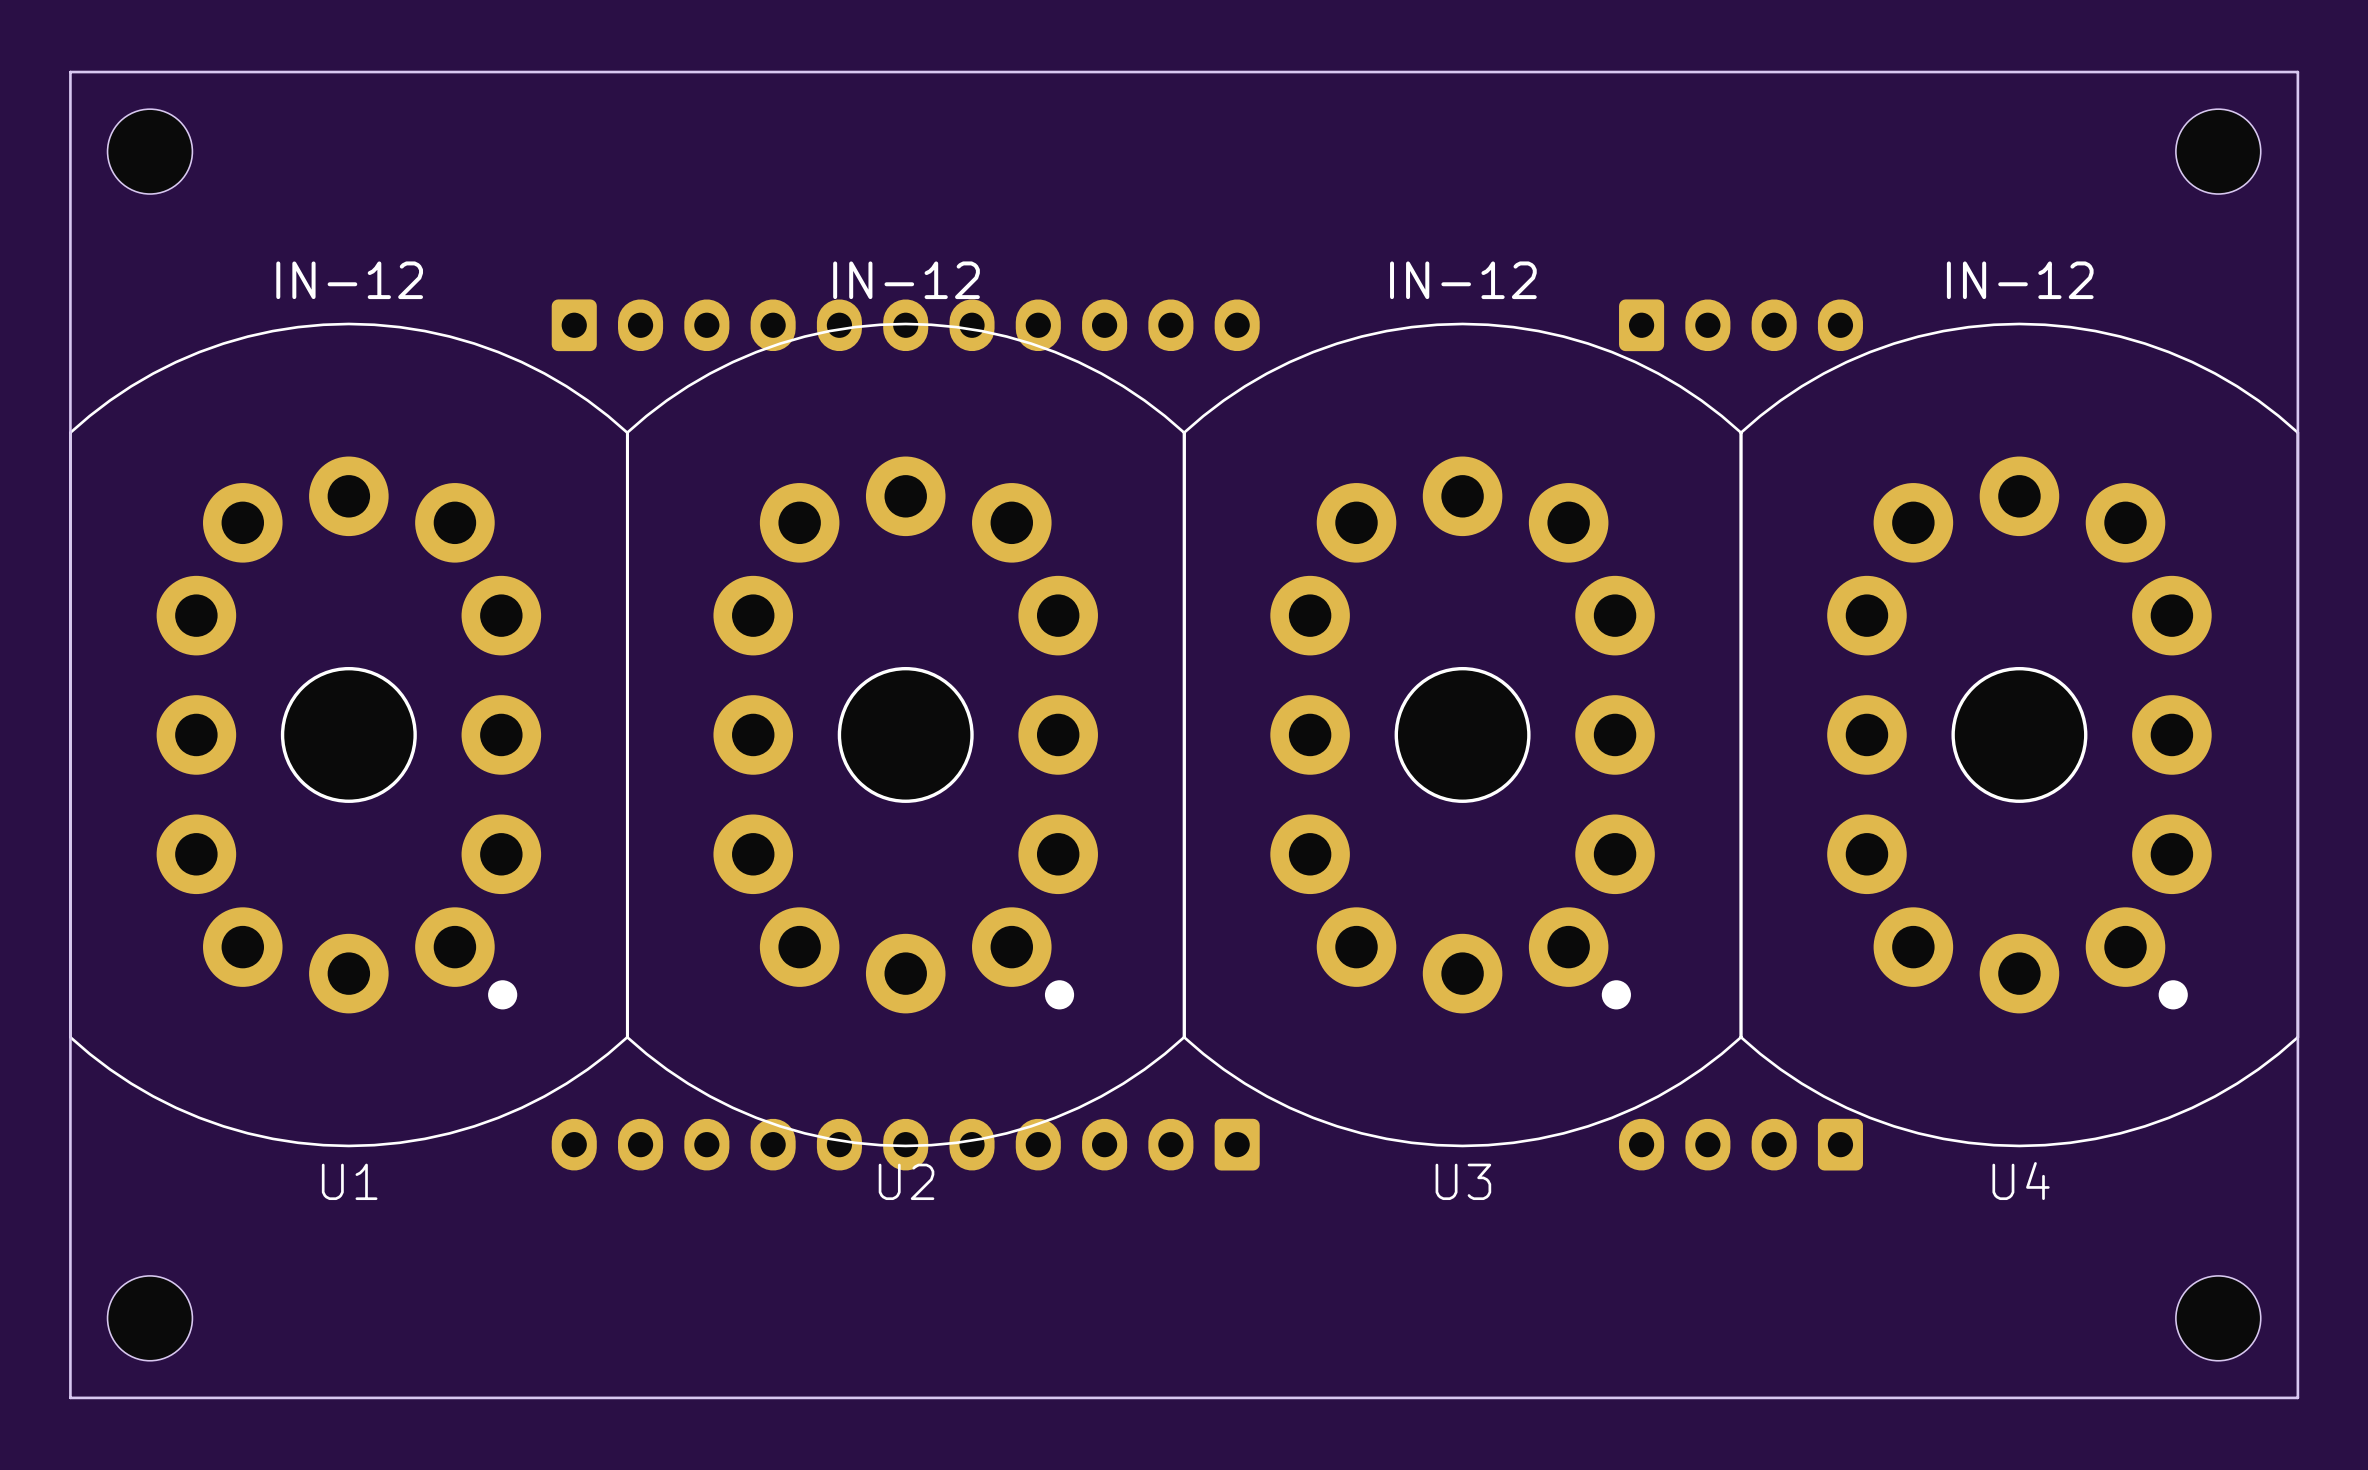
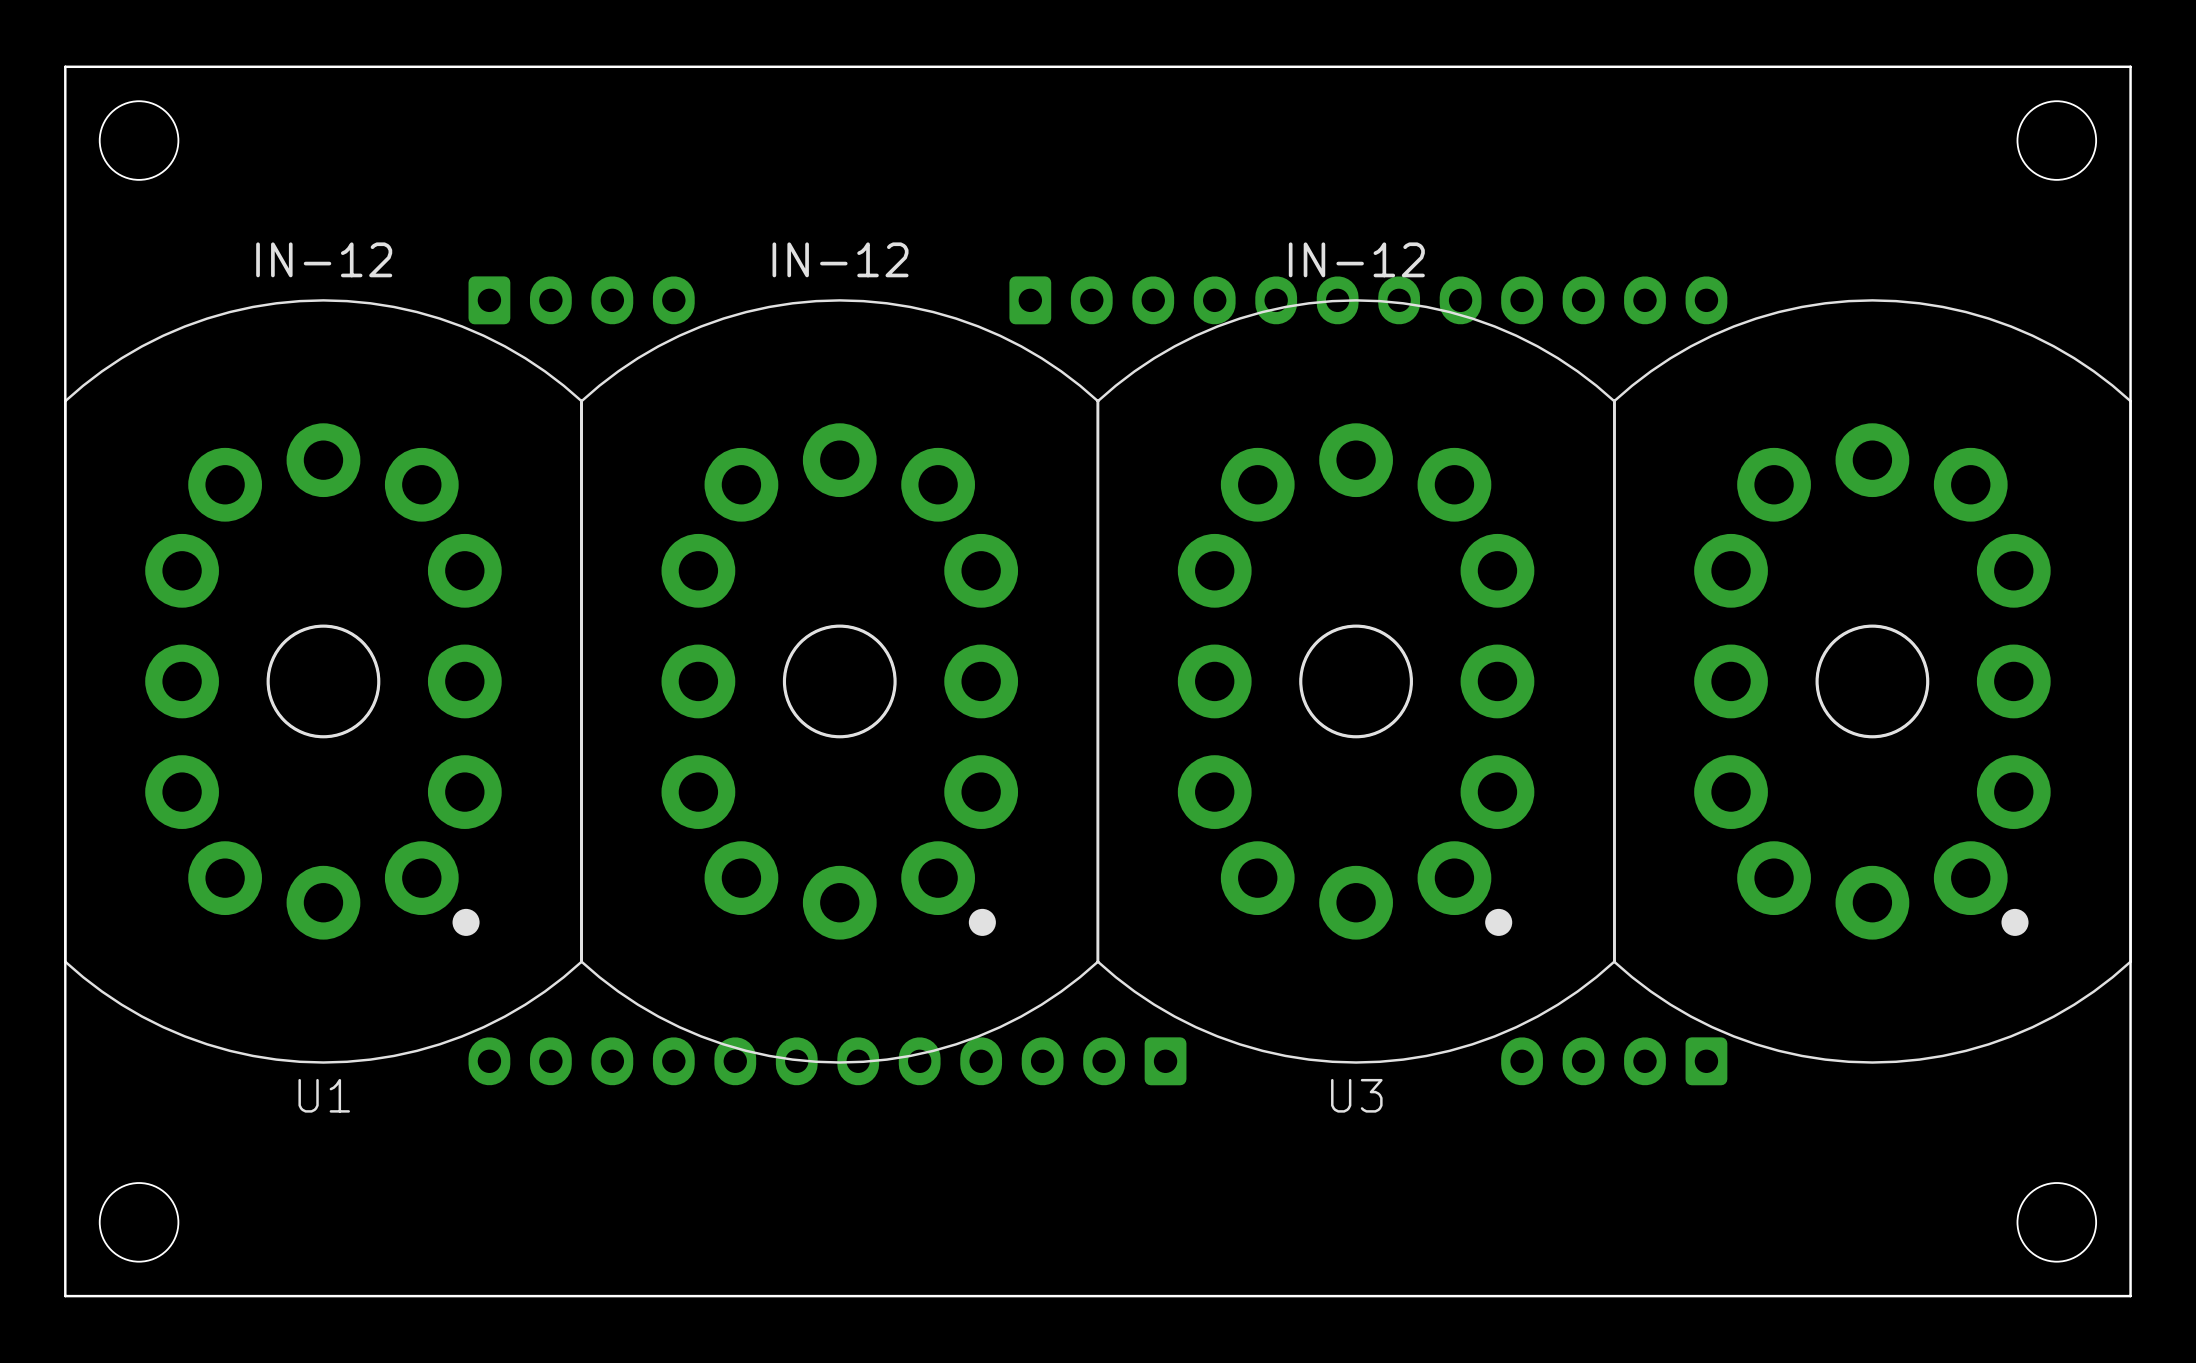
U1 footprint: [69, 322, 629, 1148] -> [64, 299, 583, 1064]
U3 footprint: [1182, 322, 1743, 1148] -> [1096, 299, 1616, 1064]
part: none -> (581, 300)
part: none -> (1368, 300)
part: (905, 325) -> none
part: (1741, 325) -> none
U2: IN-12 (905, 734) -> none
part: none -> IN-12 (839, 681)
U4: IN-12 (2019, 734) -> none
part: none -> (1872, 681)
part footprint: [551, 1118, 1260, 1171] -> [468, 1037, 1187, 1086]

